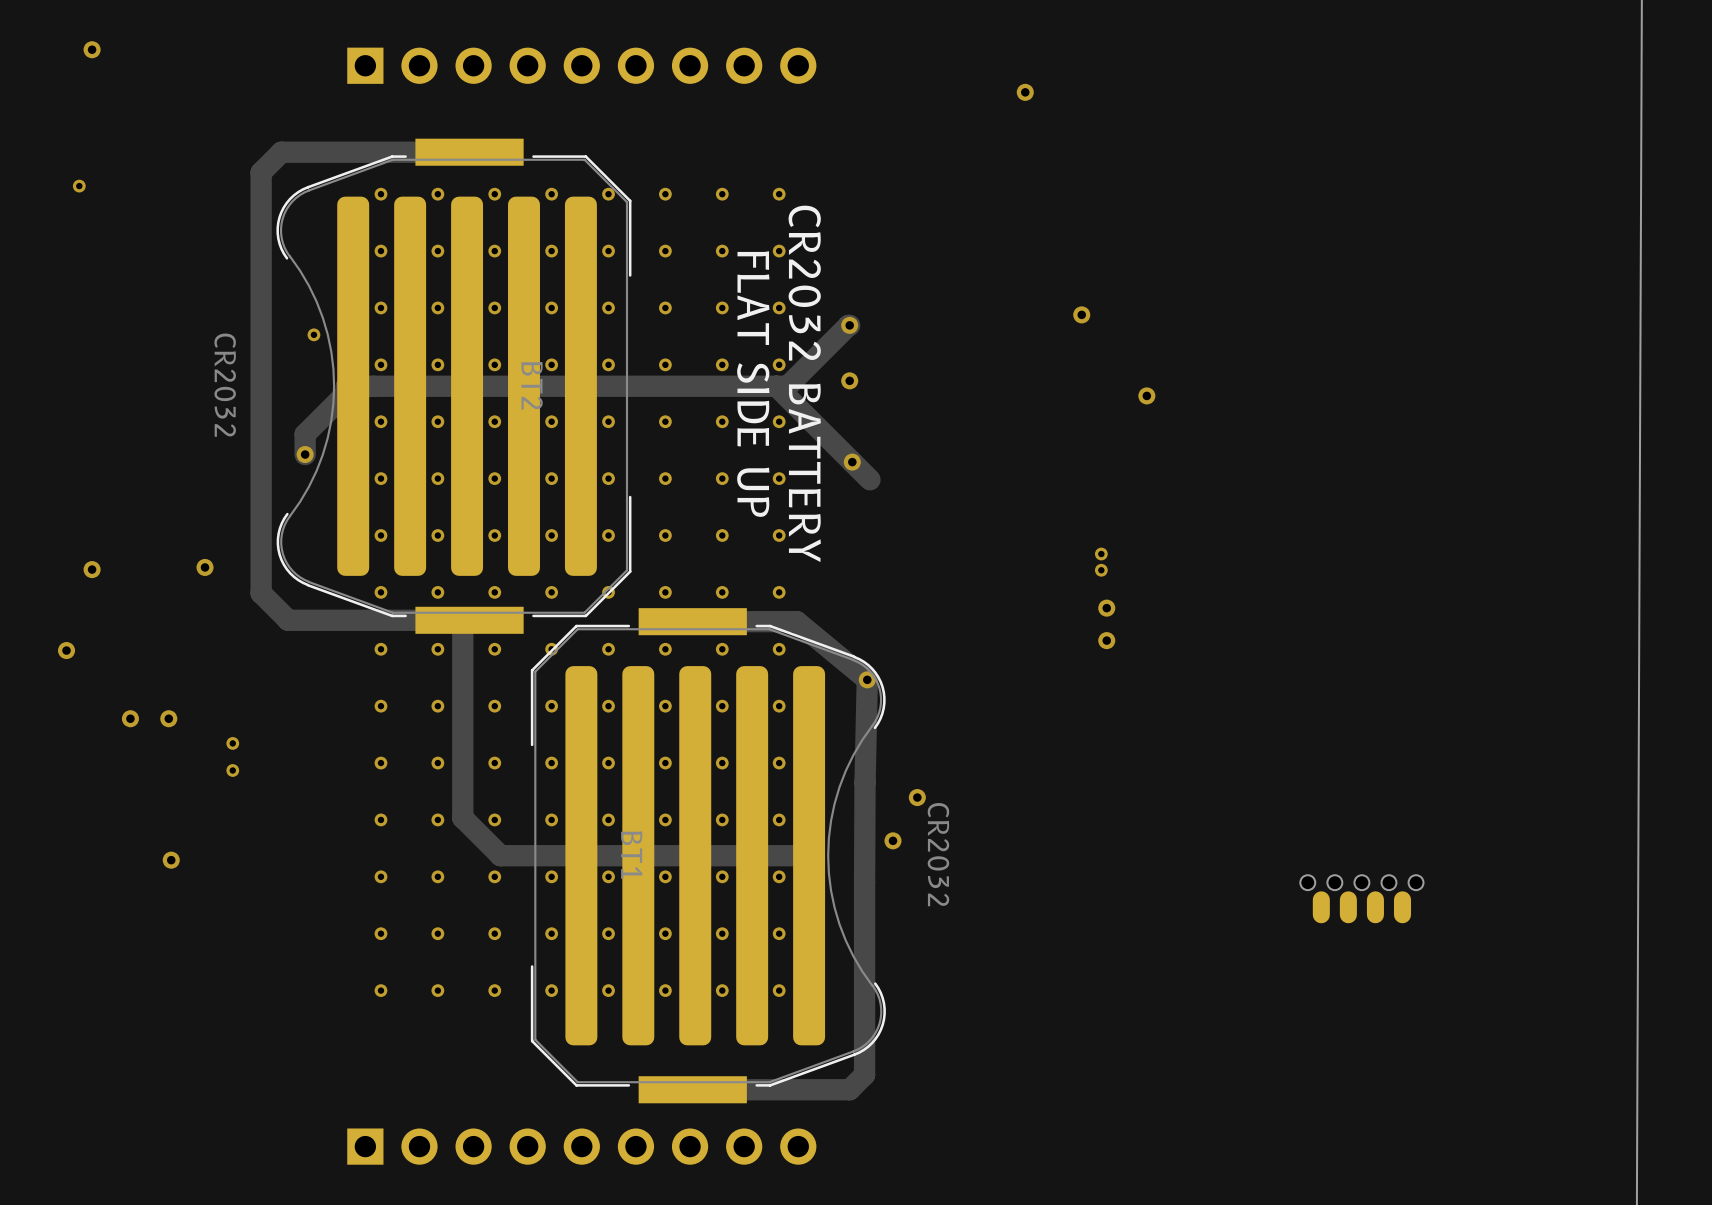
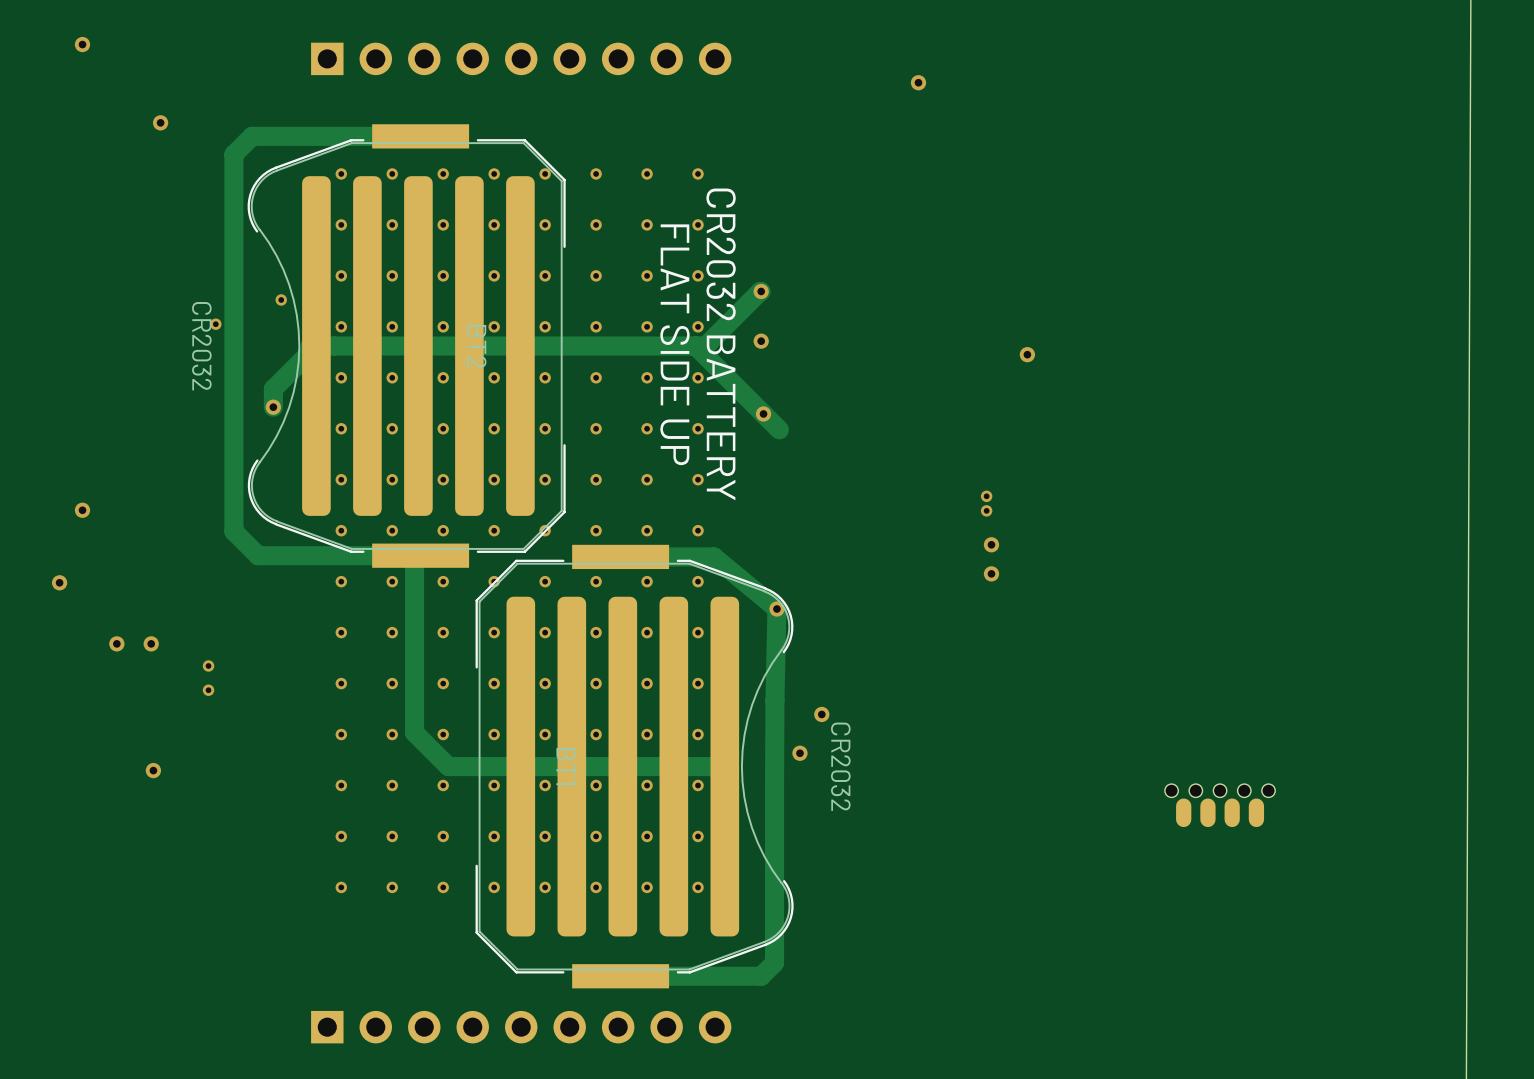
via: none -> (160, 122)
via: (79, 186) -> none
via: (1081, 314) -> none
via: none -> (215, 324)
via: (205, 567) -> none

